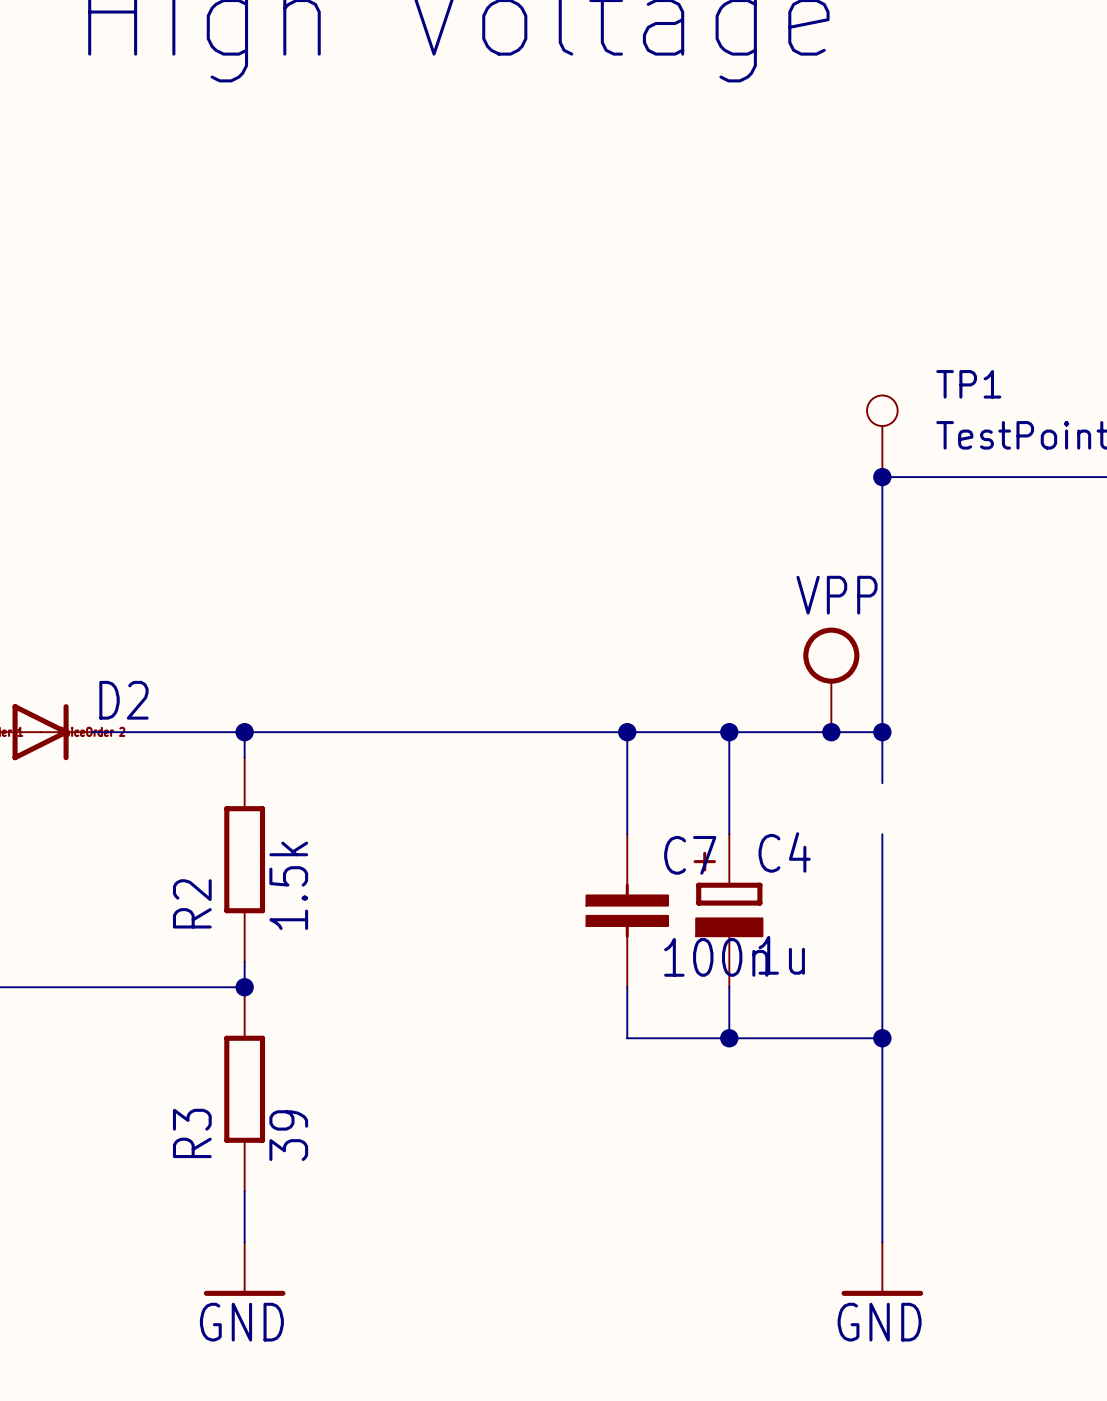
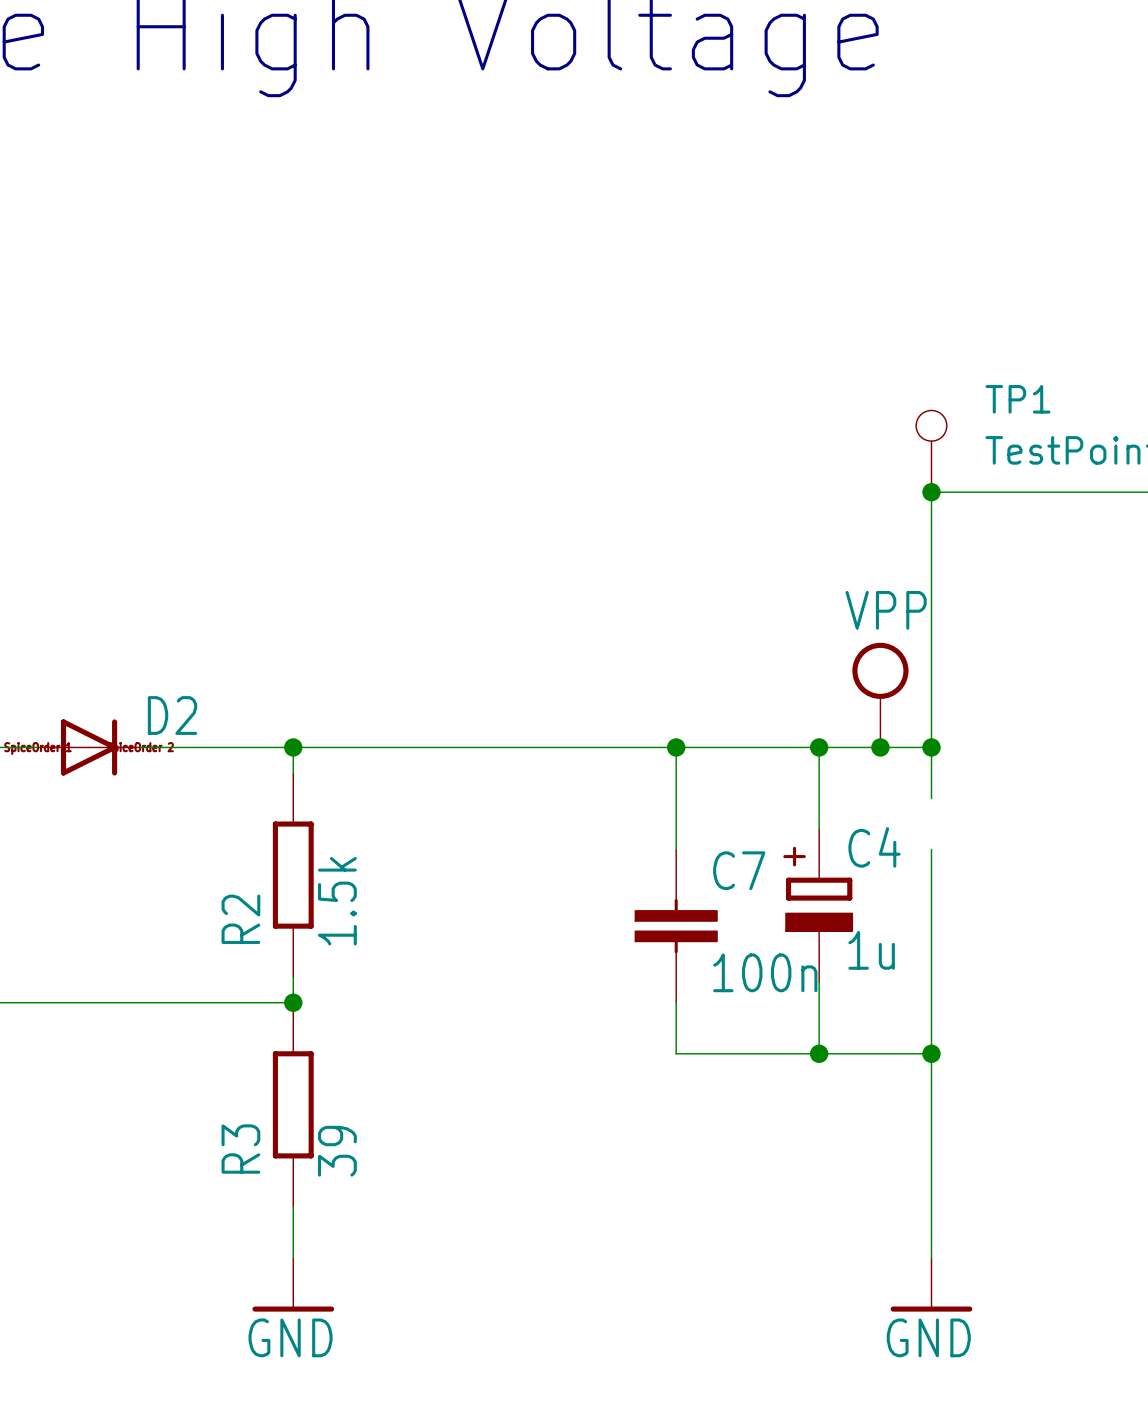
wire: (729, 732) (729, 834) -> none
junction position: (729, 732) -> (819, 747)
wire: none -> (819, 747) (819, 829)
C4 position: (729, 910) -> (819, 905)
wire: none -> (819, 982) (819, 1053)
wire: (729, 987) (729, 1038) -> none
junction position: (729, 1038) -> (819, 1053)

